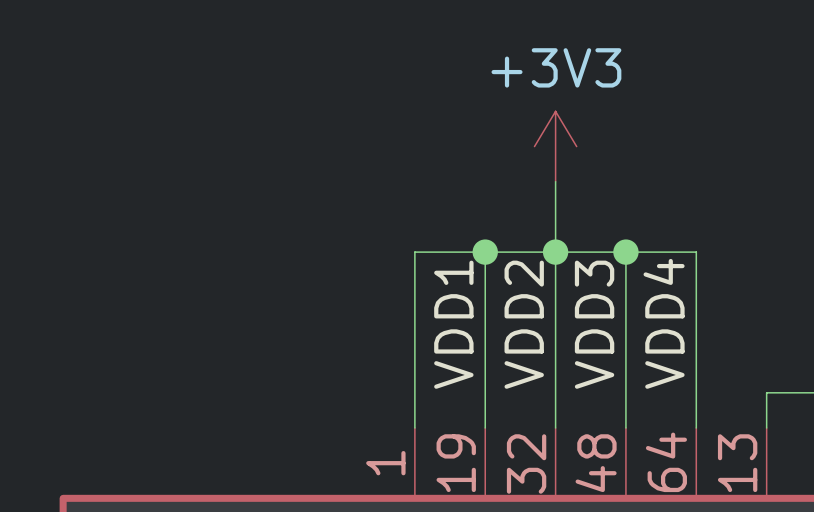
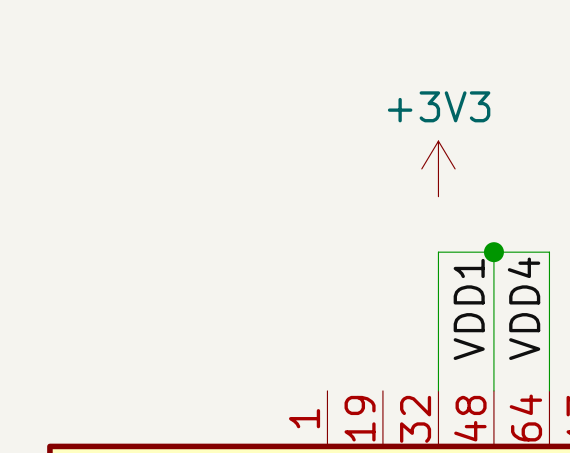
wire: (555, 181) (555, 252) (414, 252) (414, 427) -> none
wire: (485, 252) (485, 427) -> none
junction: (485, 252) -> none
junction: (555, 252) -> none
label: VDD1 (453, 324) -> none
label: VDD2 (524, 324) -> none
label: VDD3 (594, 324) -> VDD1 (469, 309)

